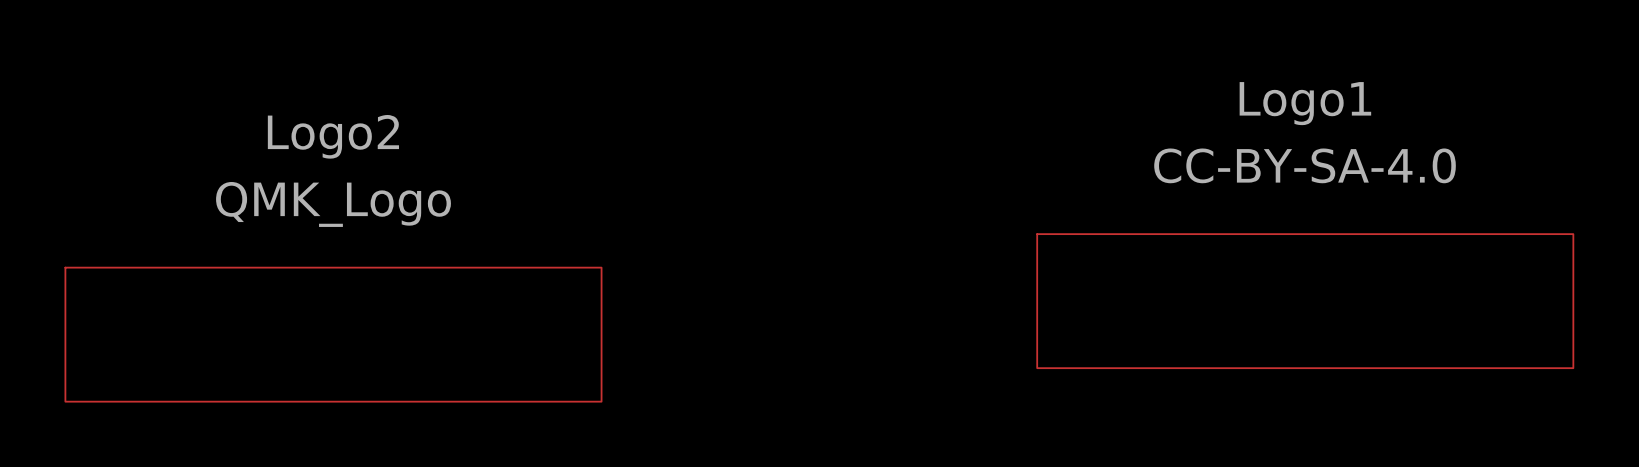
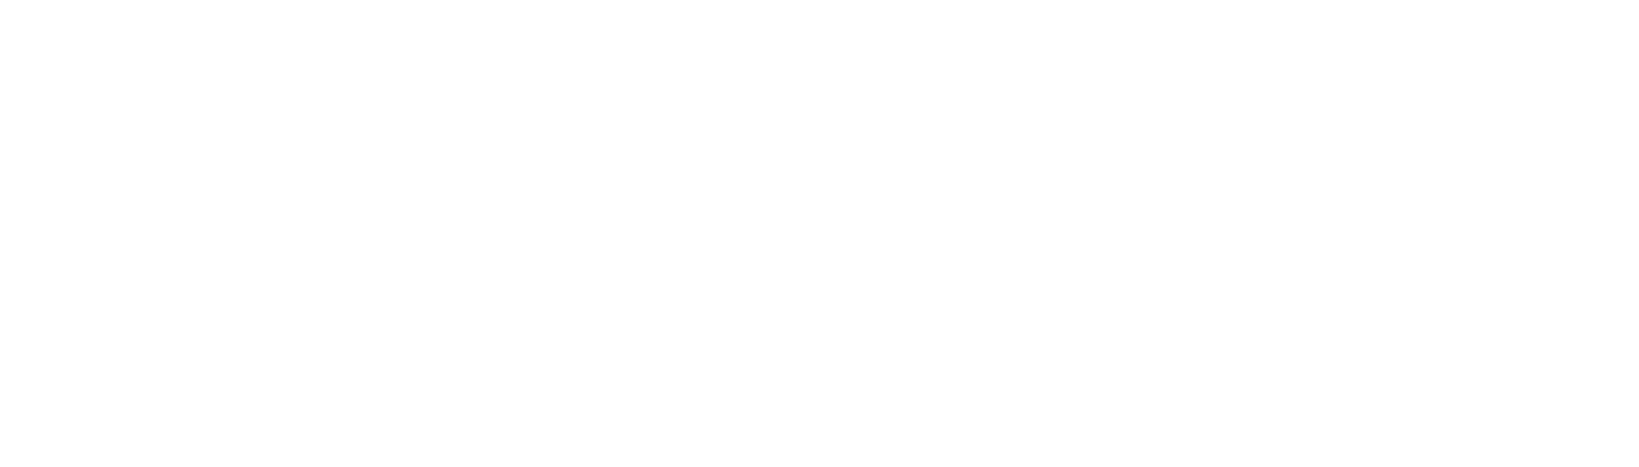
Logo1: CC-BY-SA-4.0 (1305, 301) -> none
Logo2: QMK_Logo (333, 334) -> none

